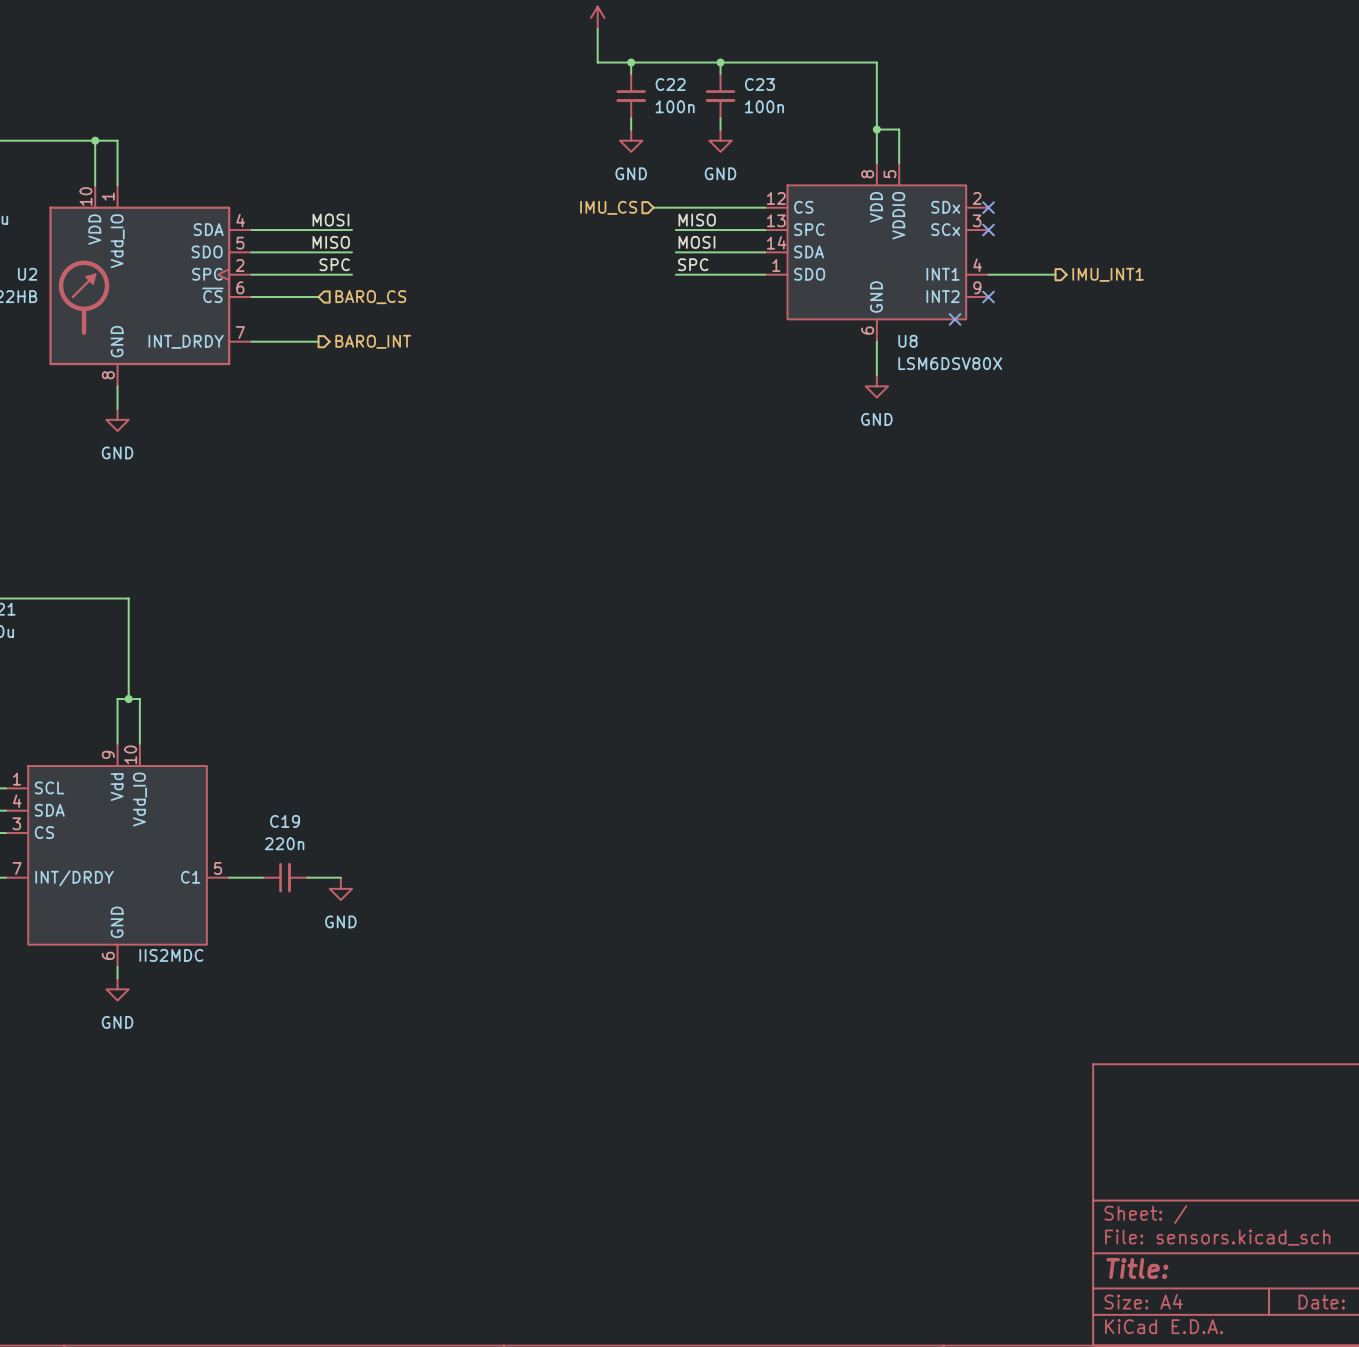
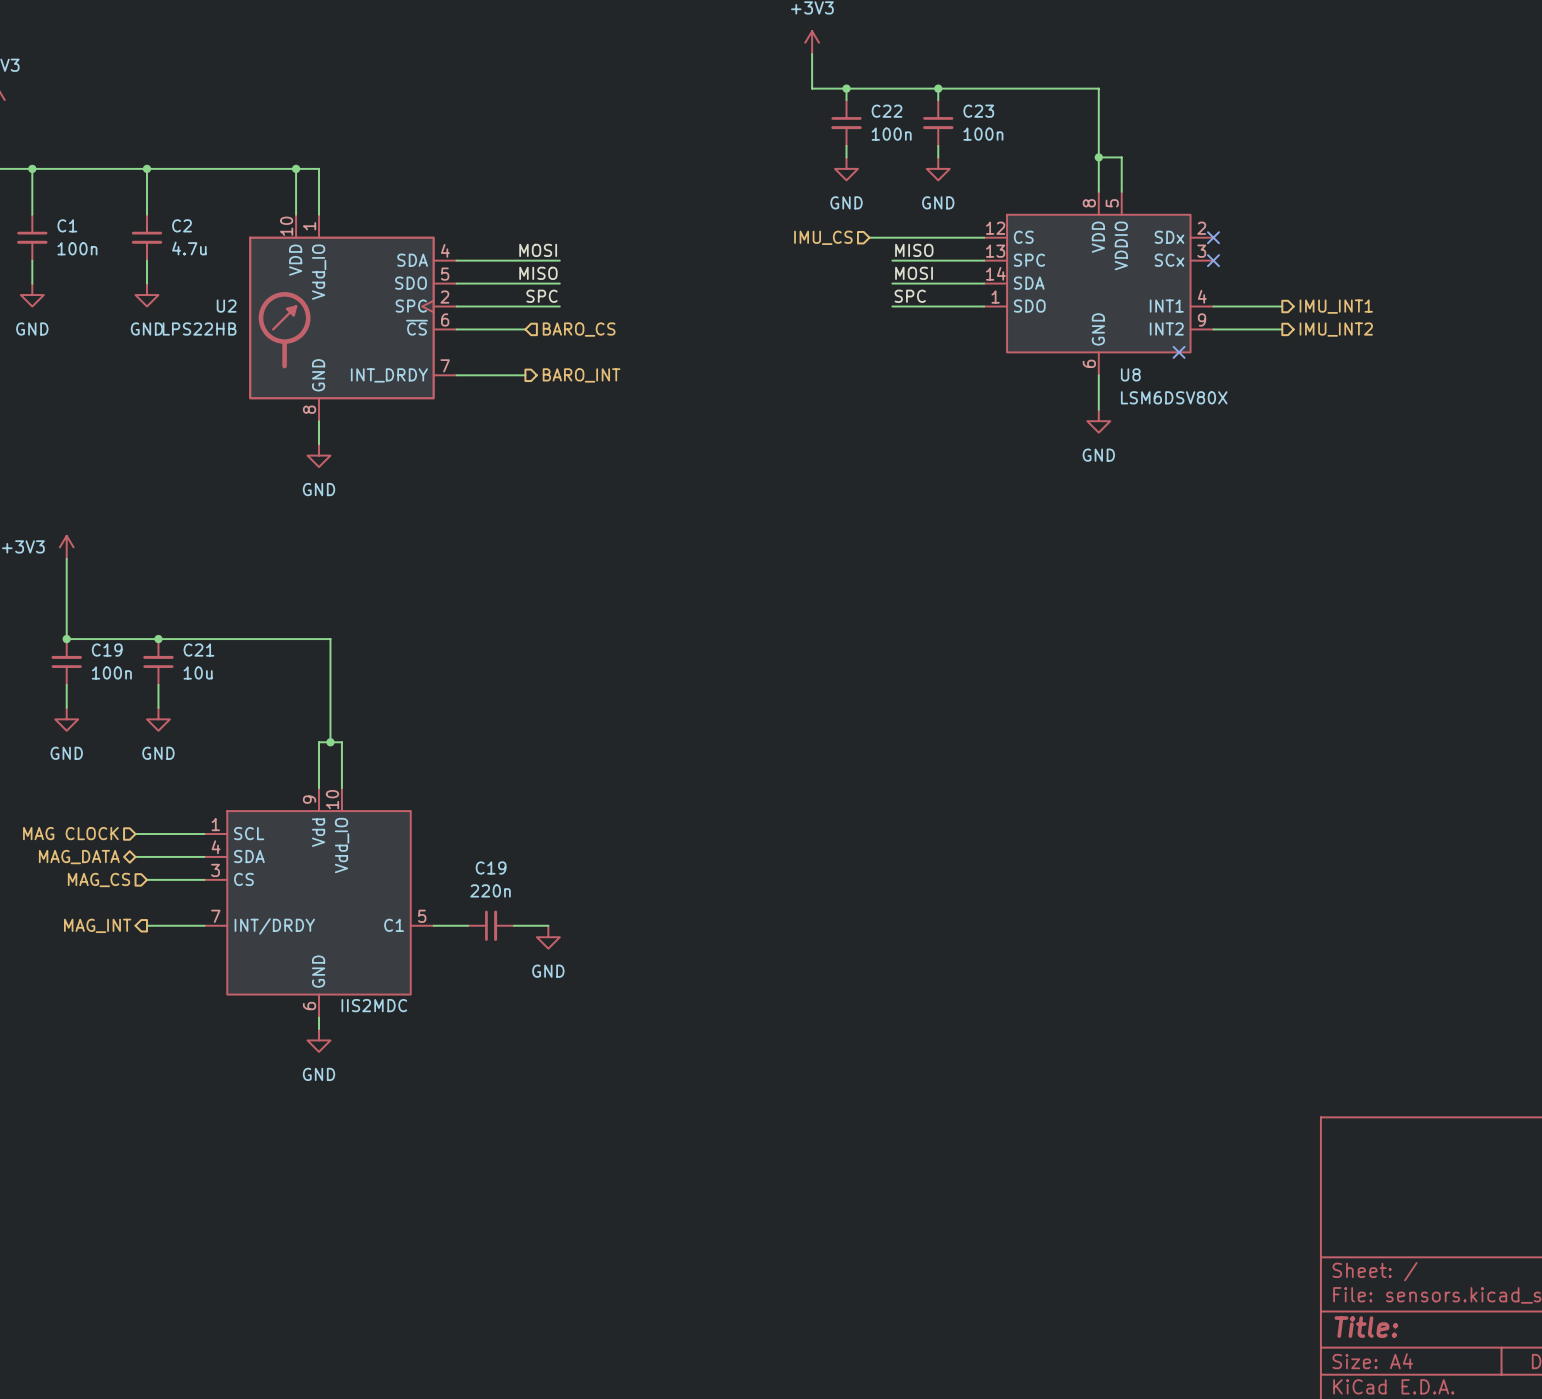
wire: none -> (1213, 329) (1282, 329)
no-connect mark: (988, 297) -> none
hierarchical label: none -> IMU_INT2 (1336, 329)

